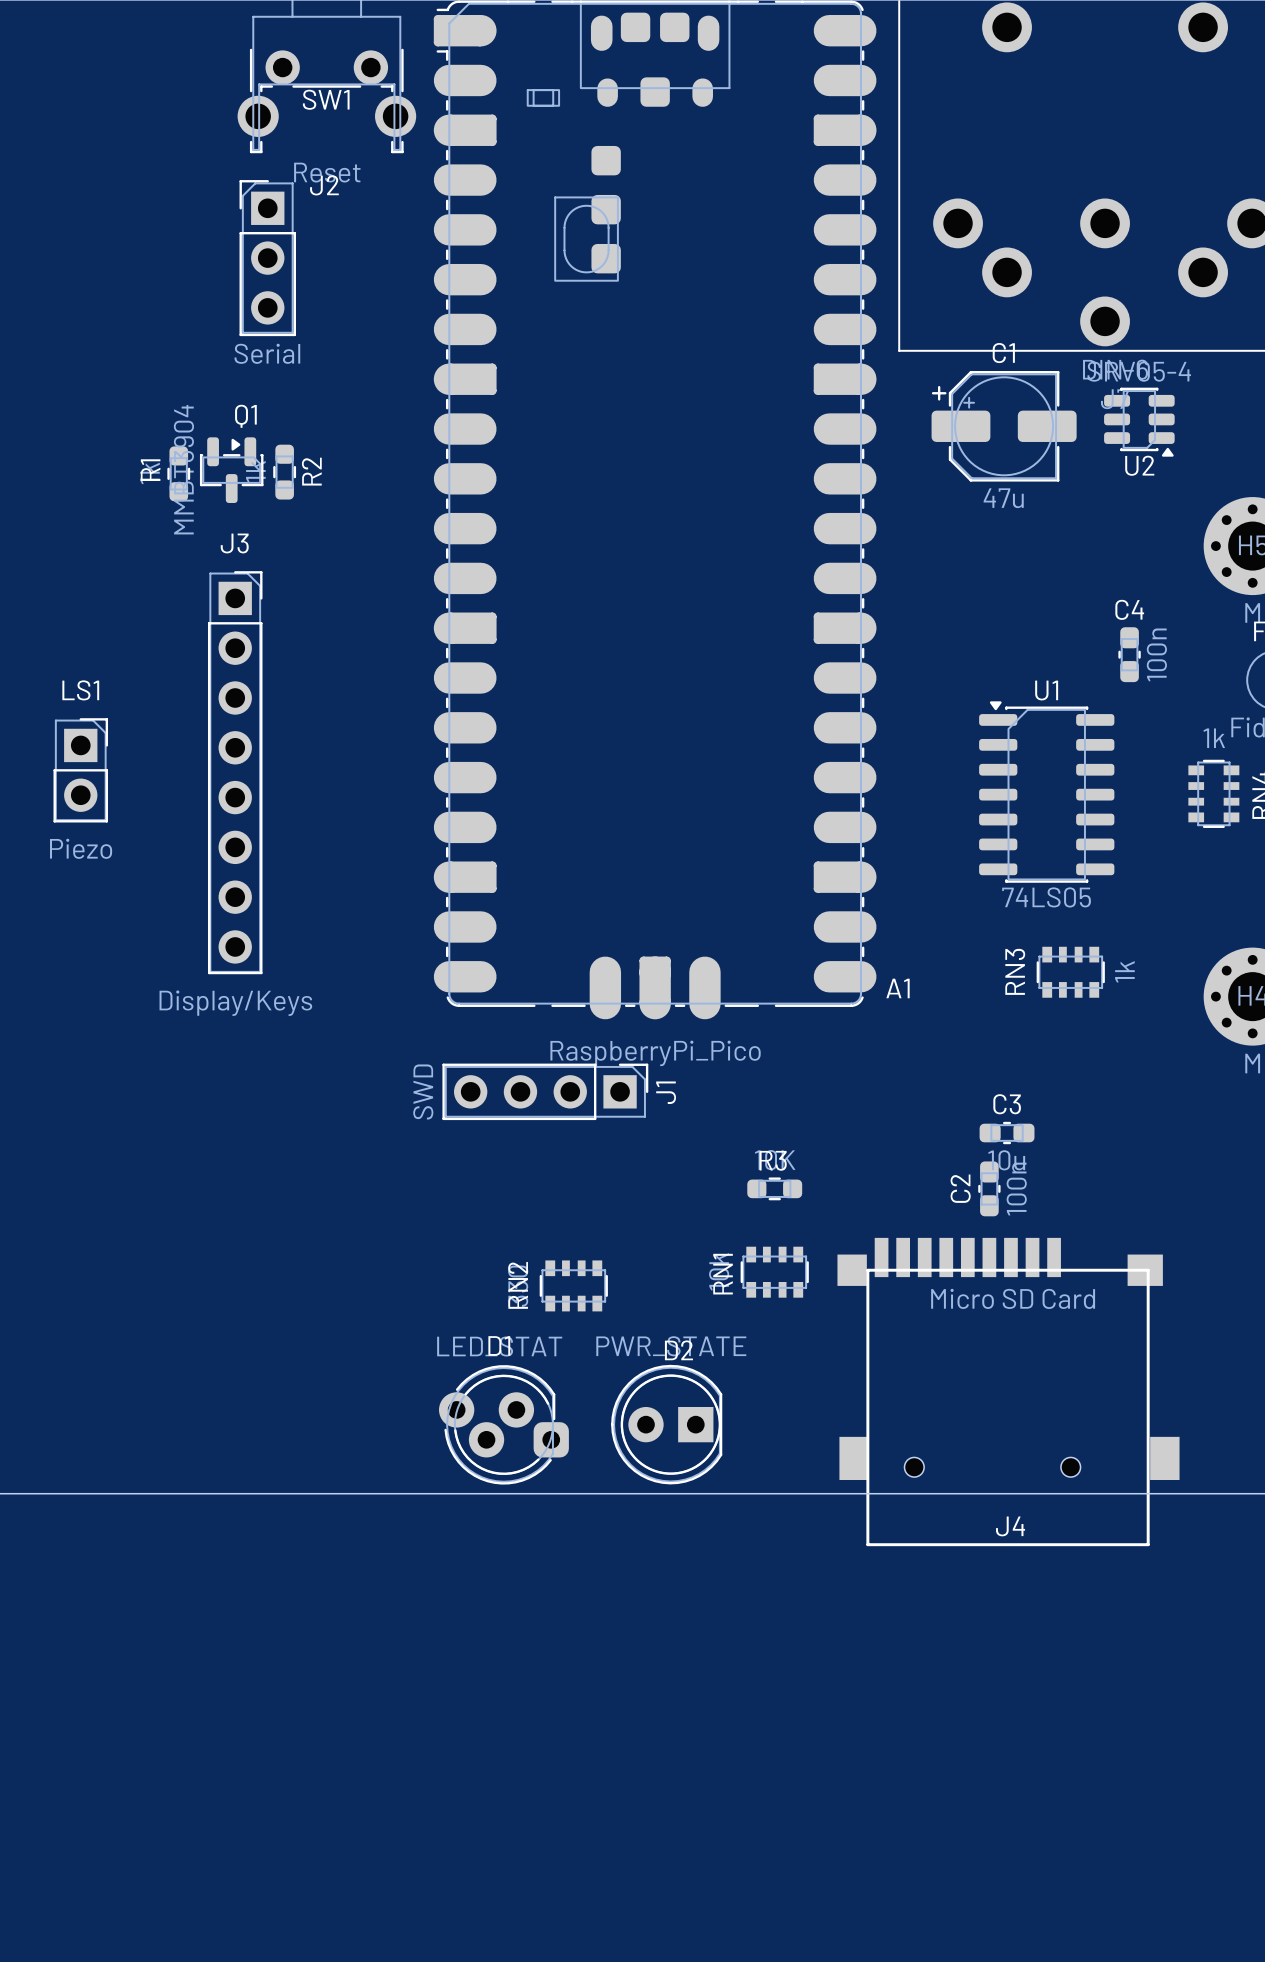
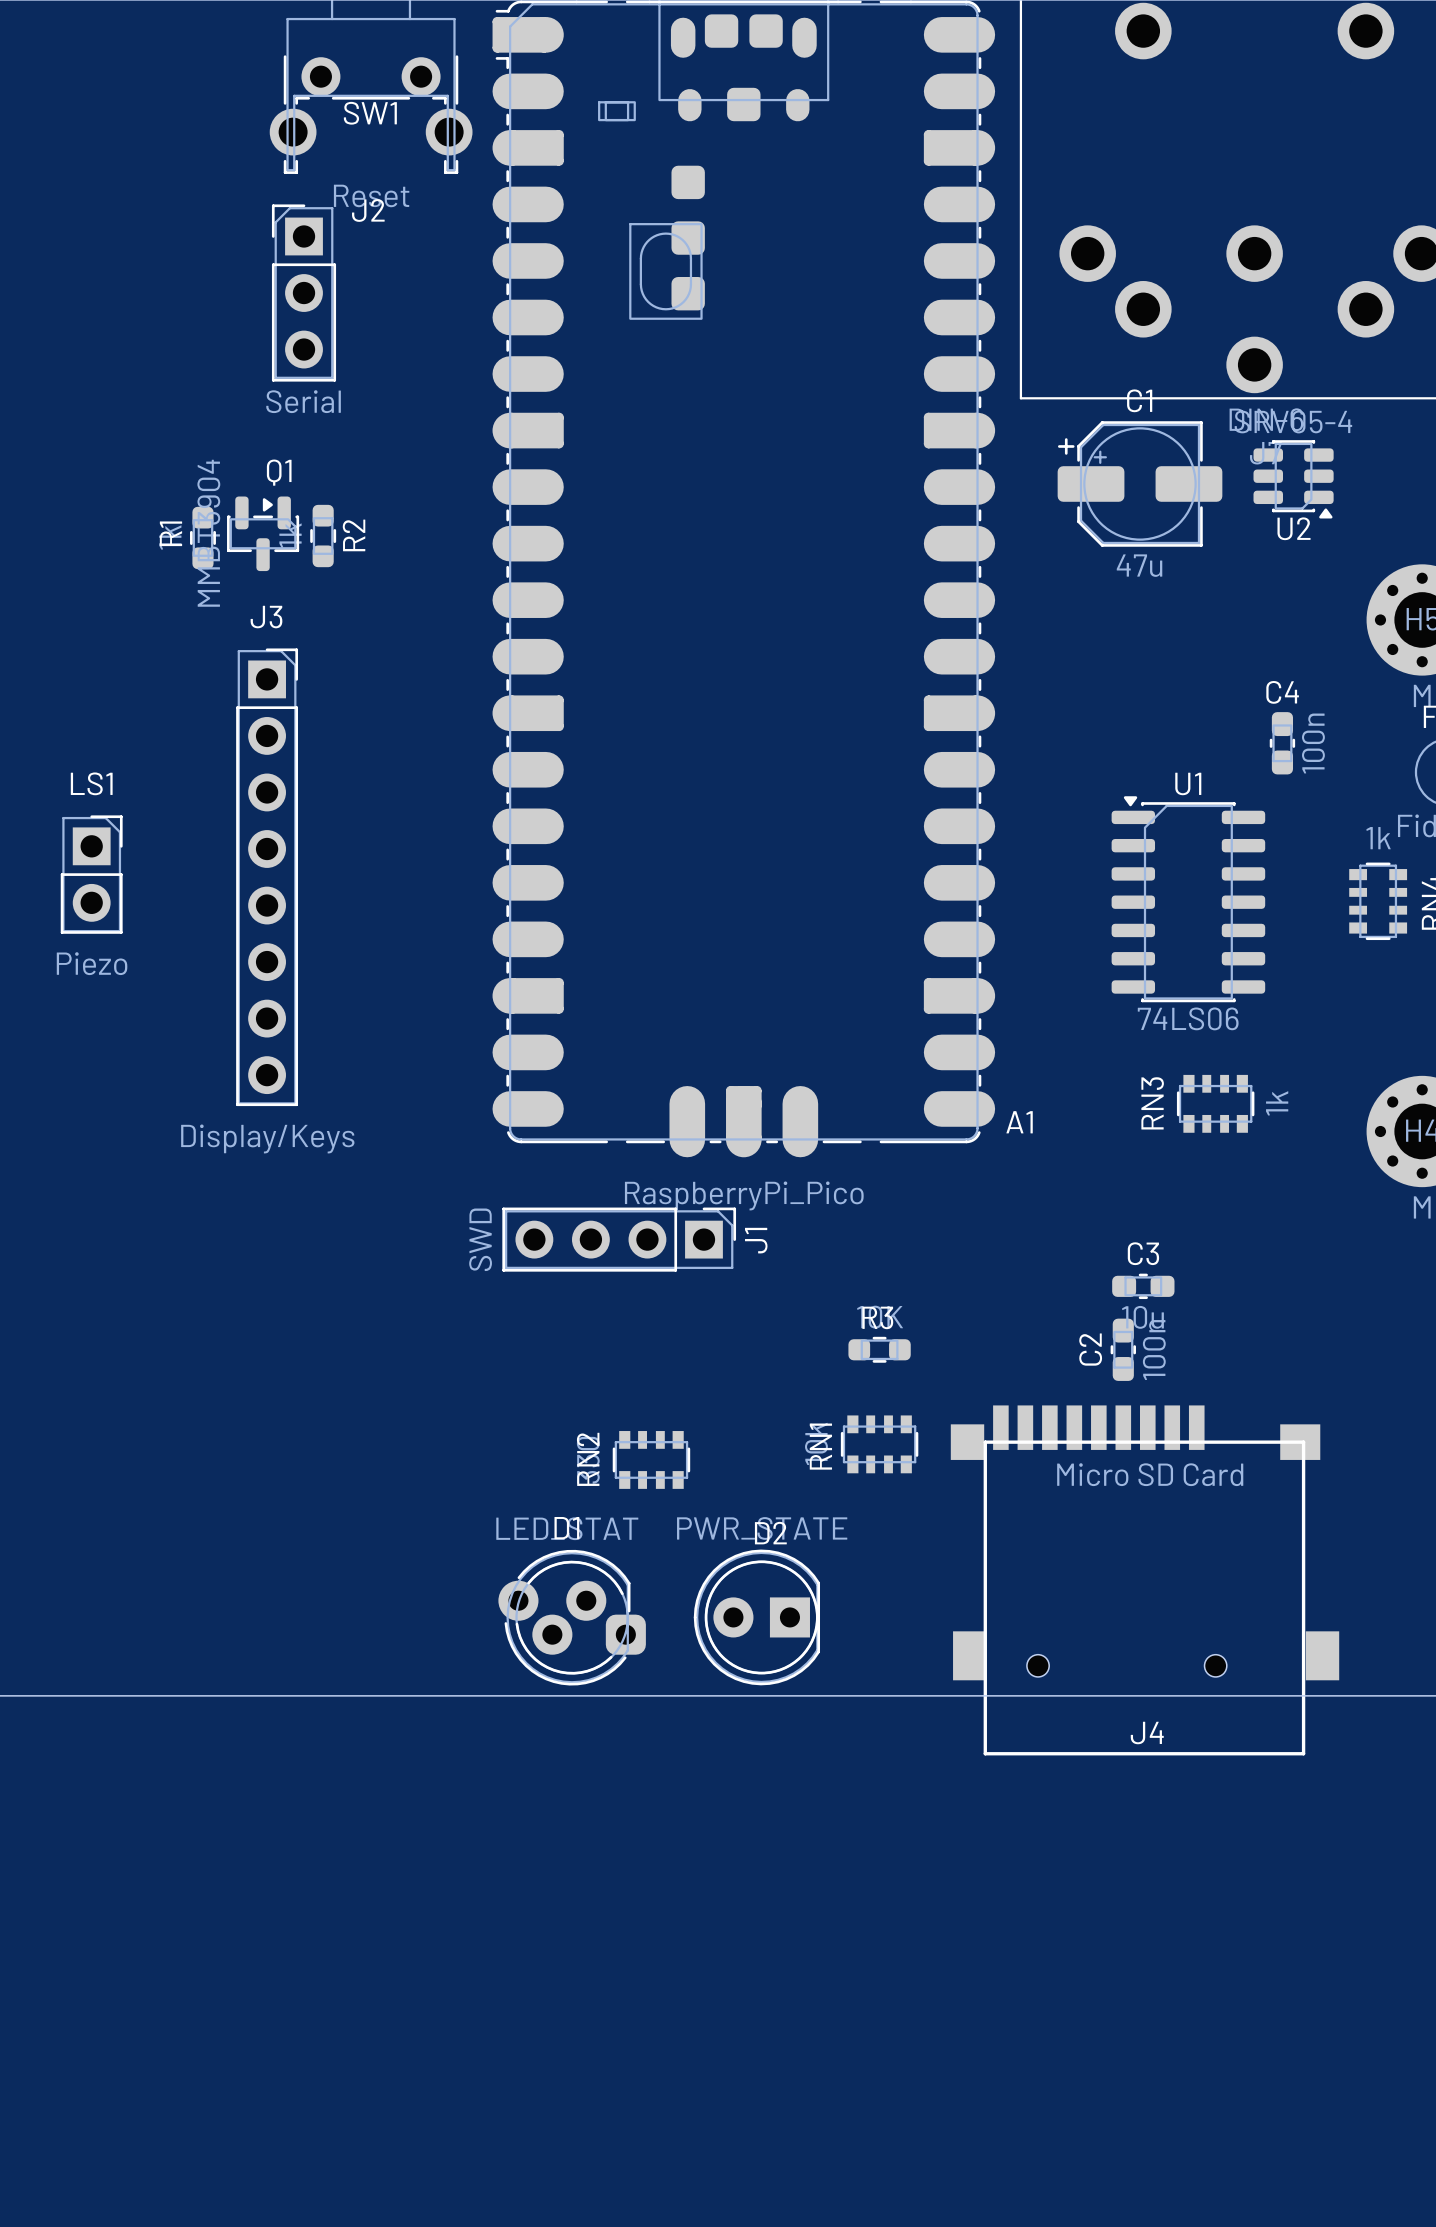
U1 value: 74LS05 (1046, 897) -> 74LS06 (1188, 1018)

